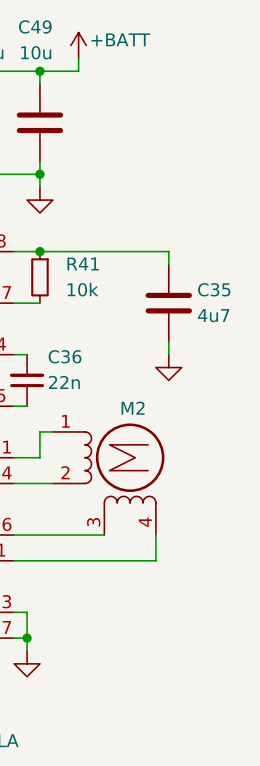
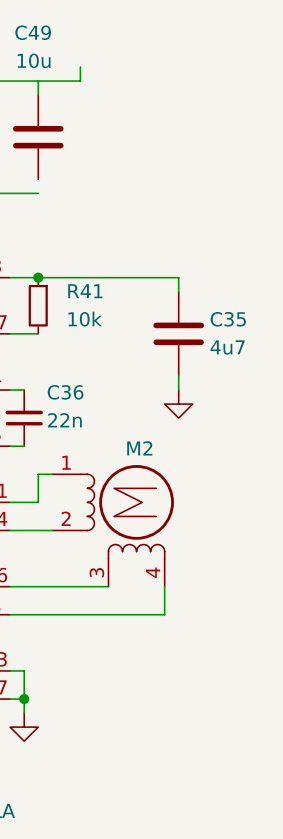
power symbol: +BATT (78, 45) -> none
junction: (39, 71) -> none
wire: (39, 161) (39, 187) -> none
junction: (39, 174) -> none
power symbol: (39, 200) -> none

